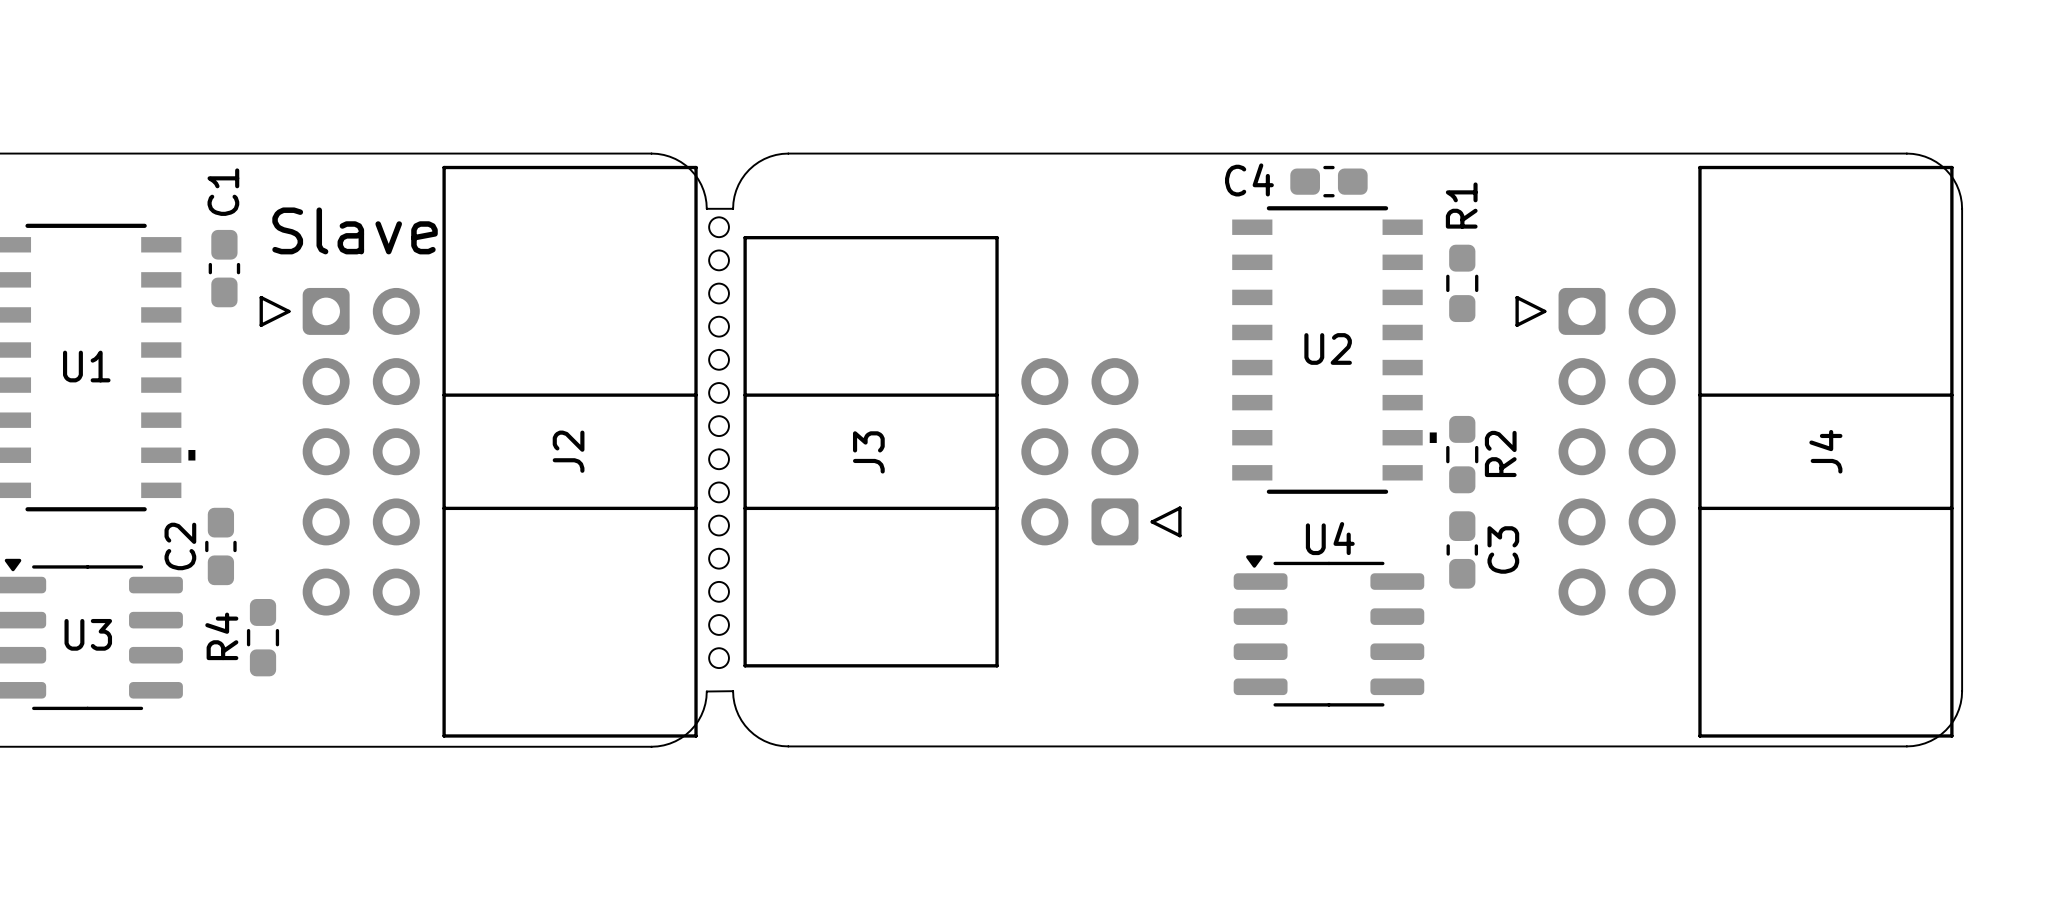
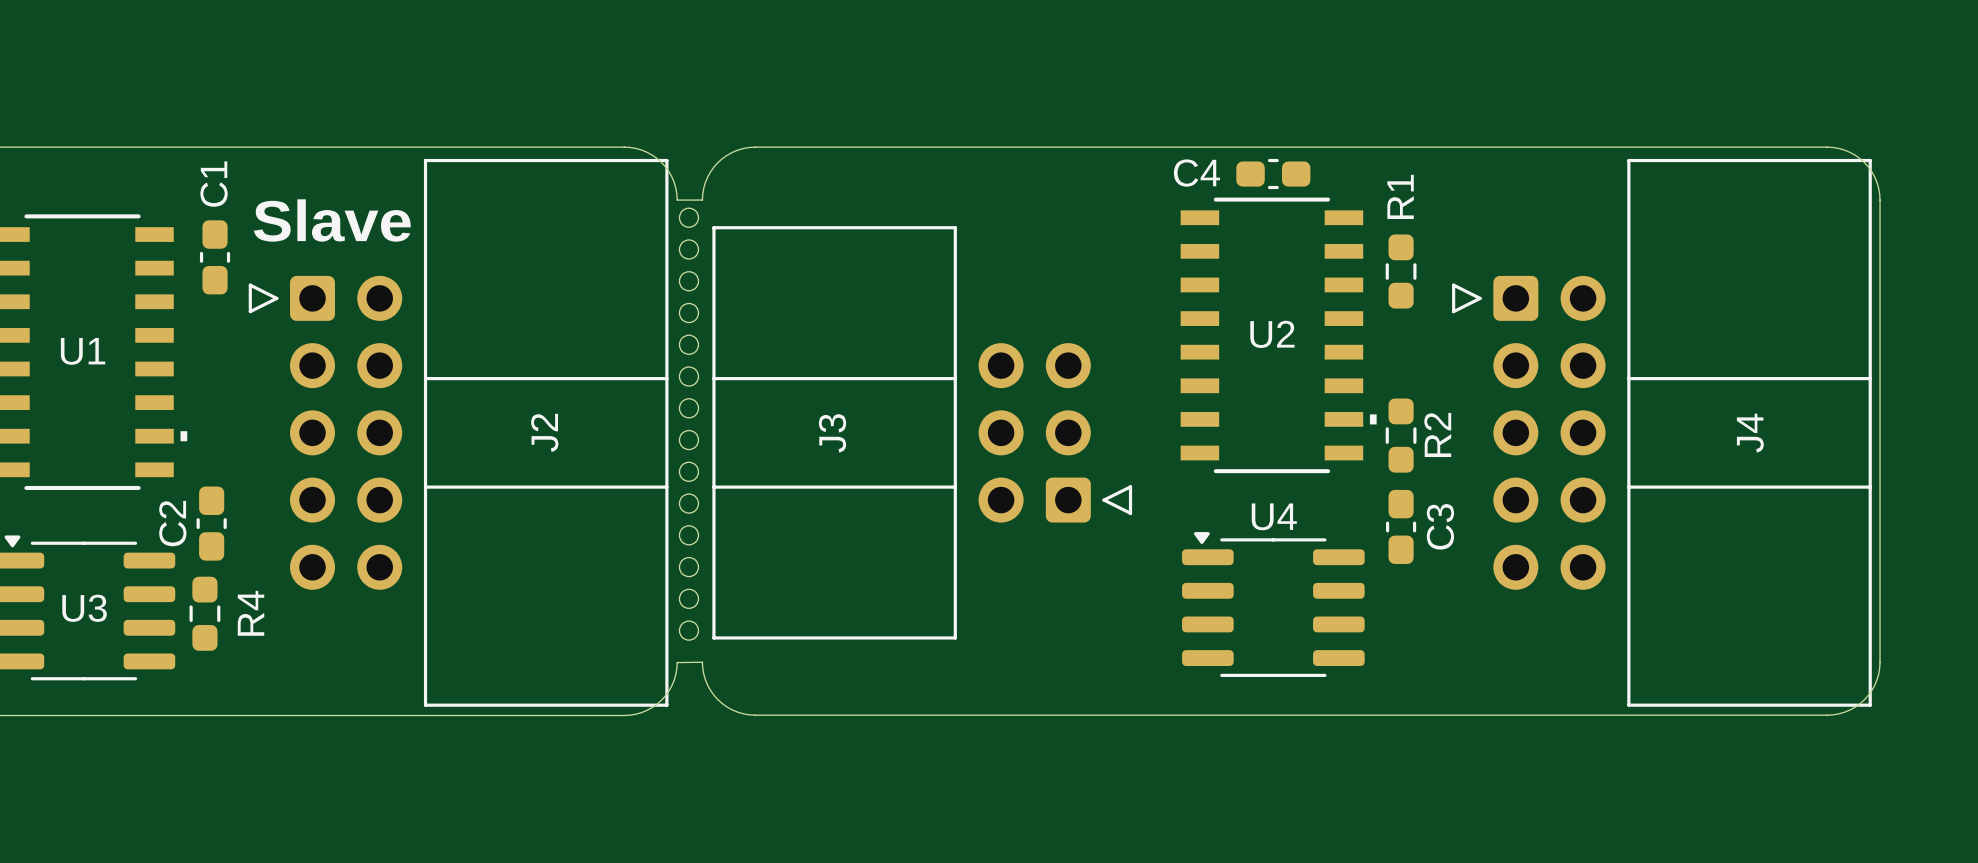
R4 name position: R4 (221, 636) -> R4 (251, 613)
R4 position: (263, 637) -> (204, 613)

